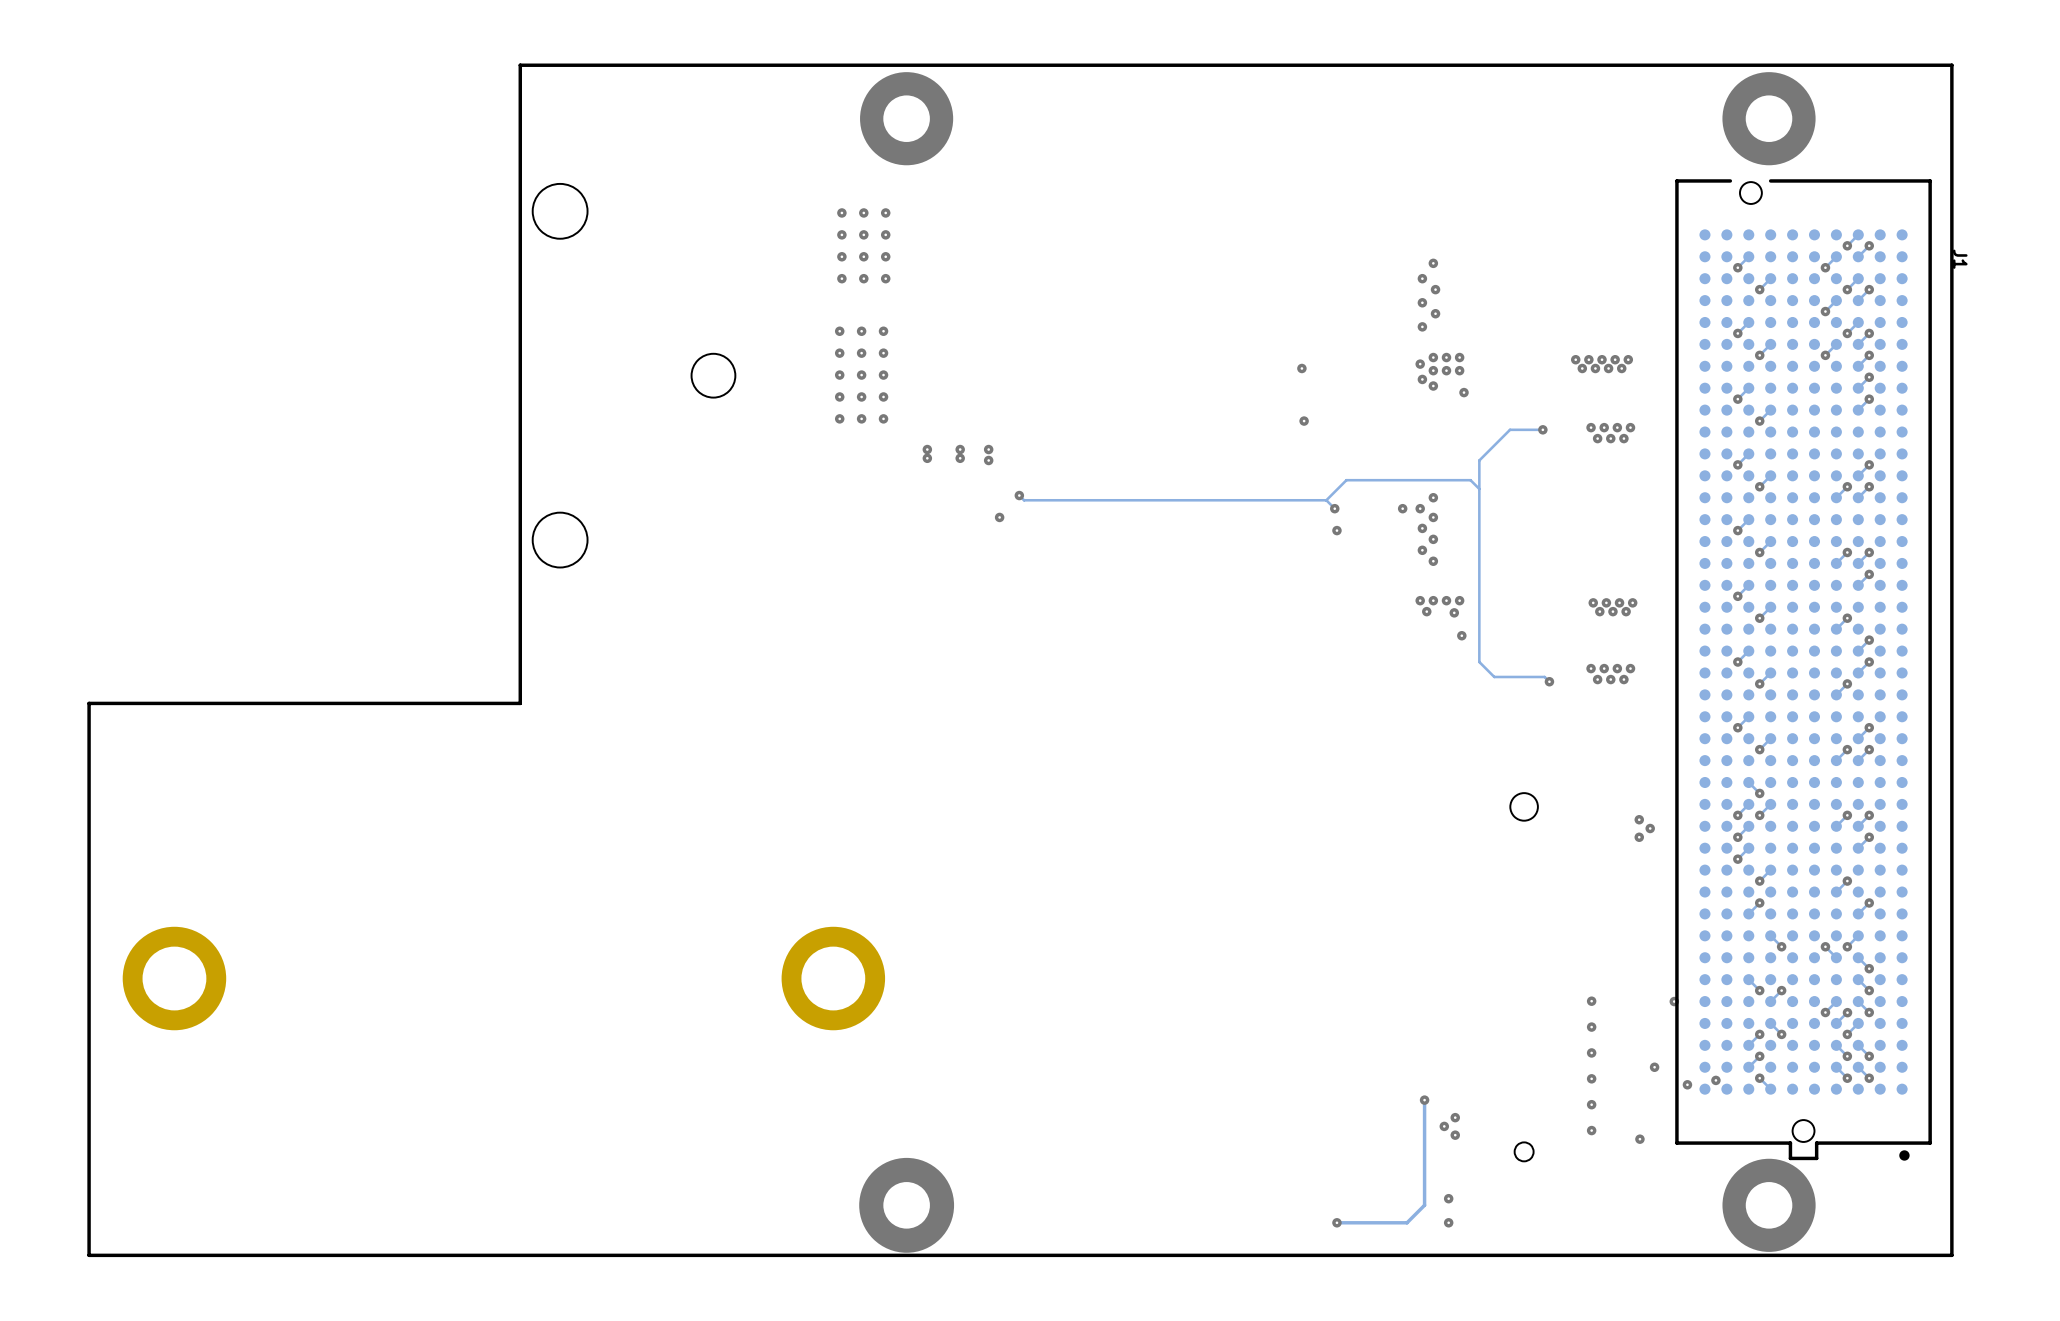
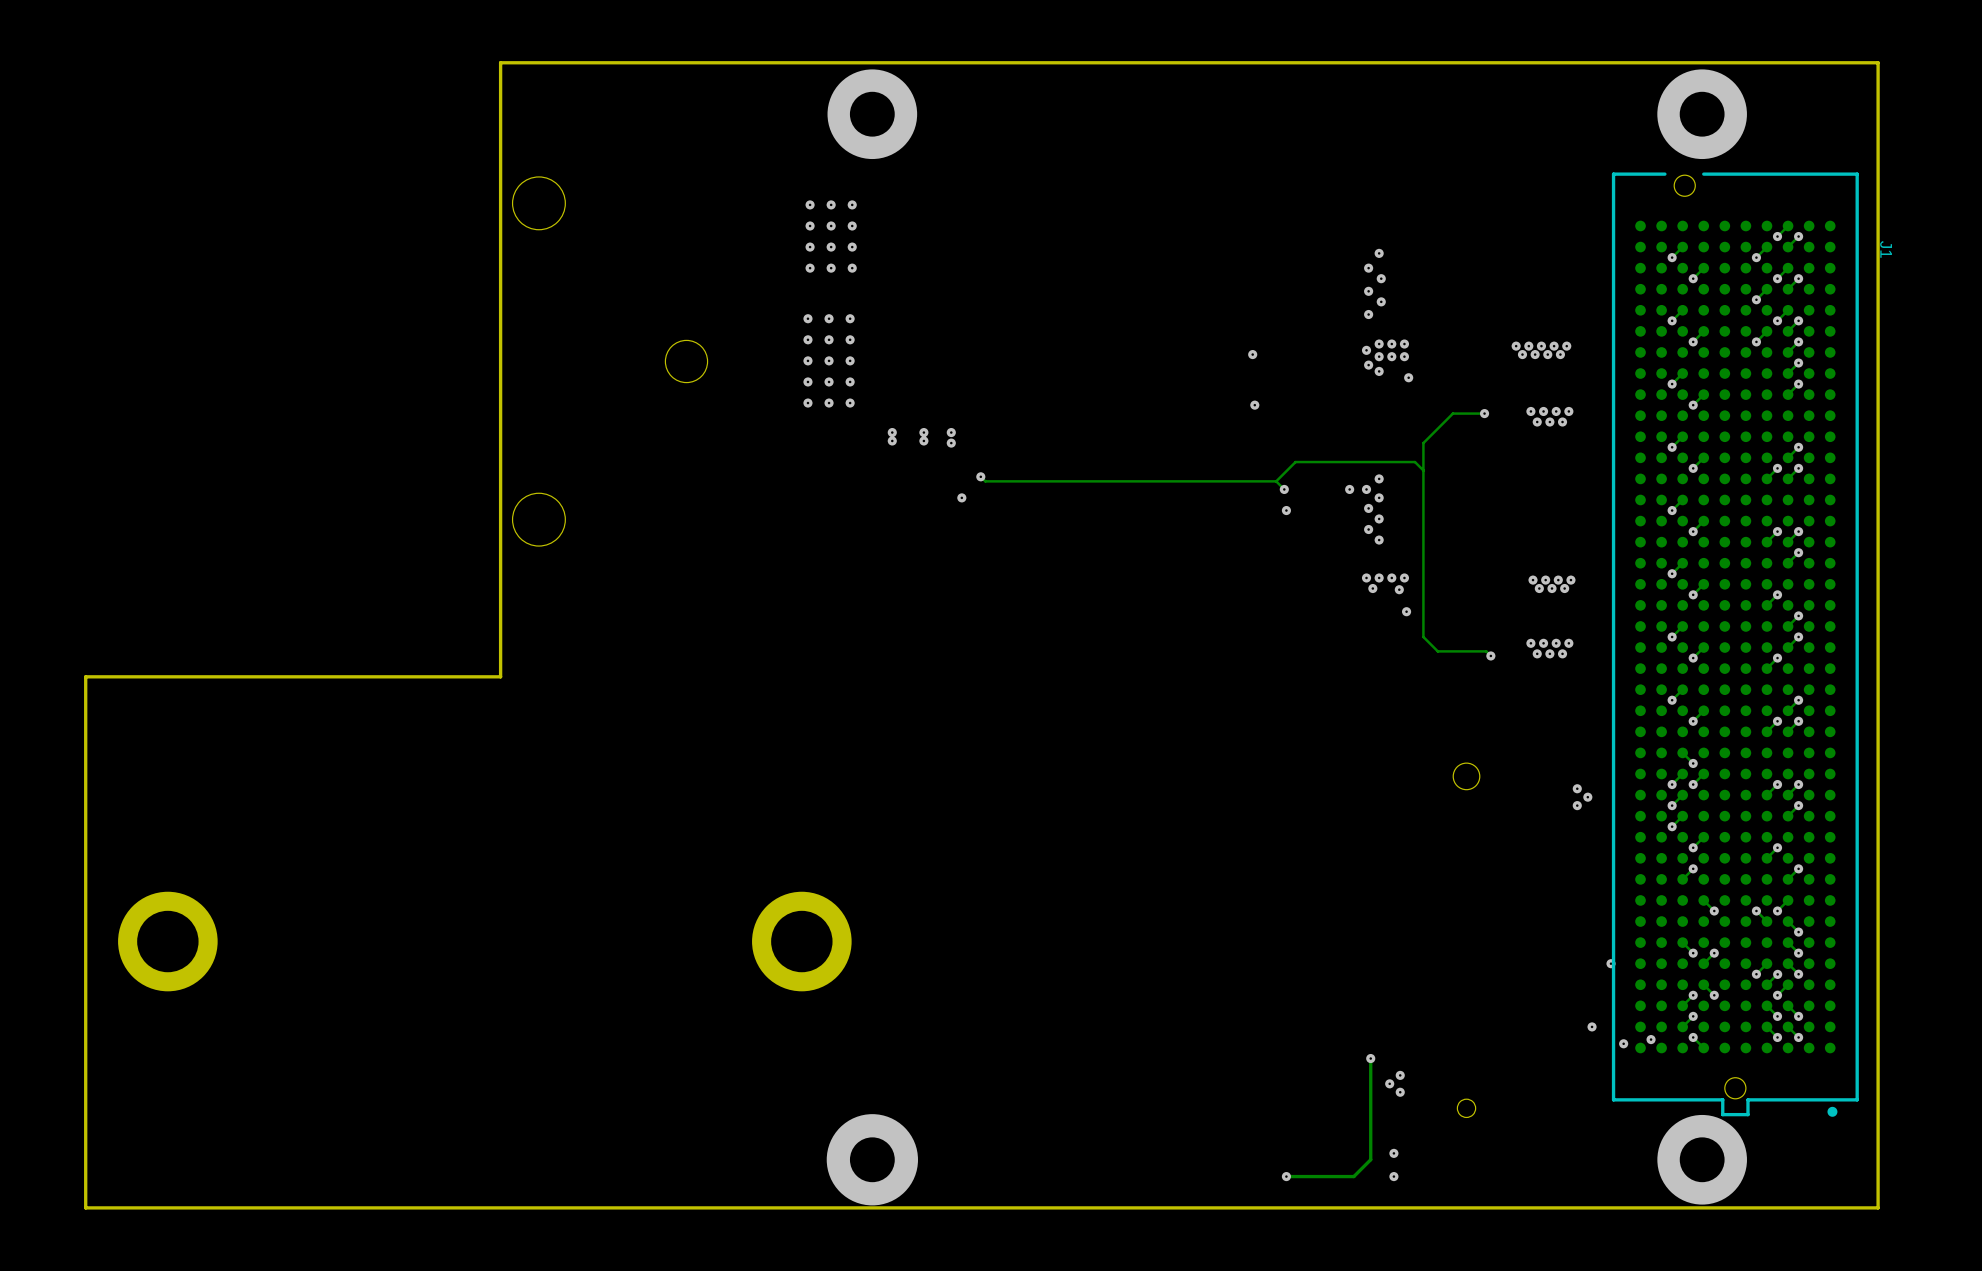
via: (1591, 1001) -> none
via: (1591, 1027) -> none
via: (1591, 1052) -> none
via: (1591, 1078) -> none
via: (1591, 1104) -> none
via: (1591, 1130) -> none
via: (1639, 1139) -> none

